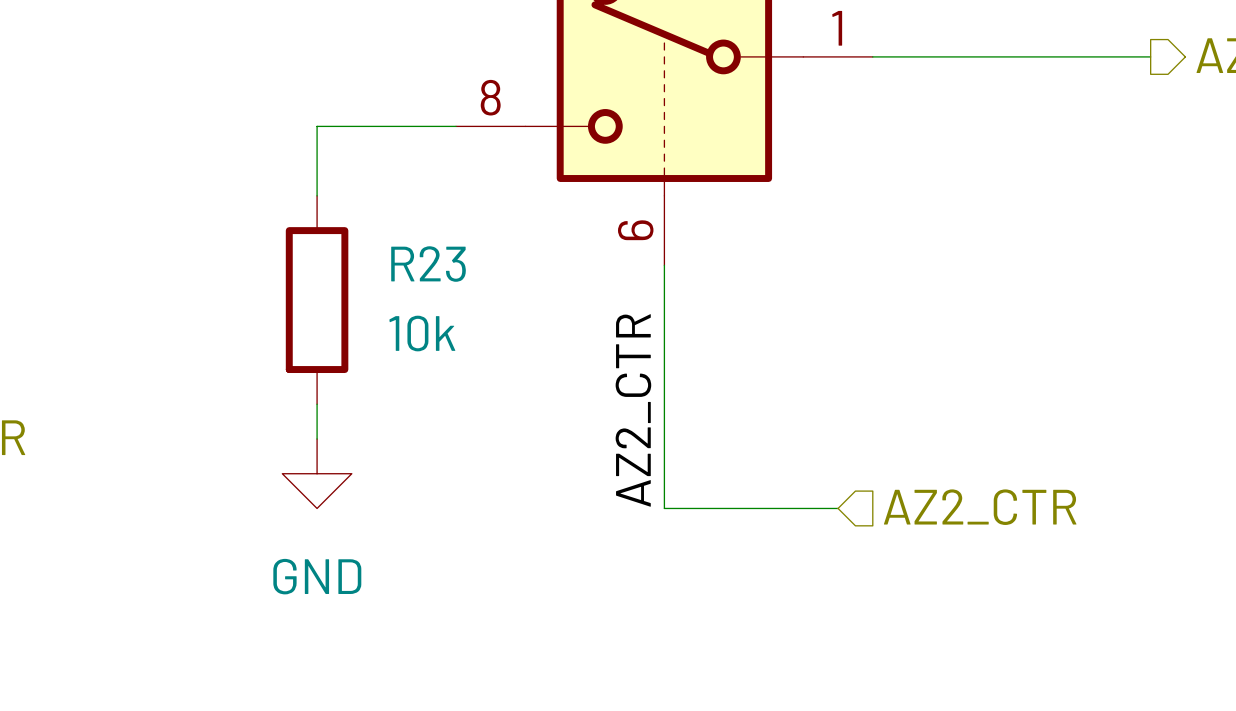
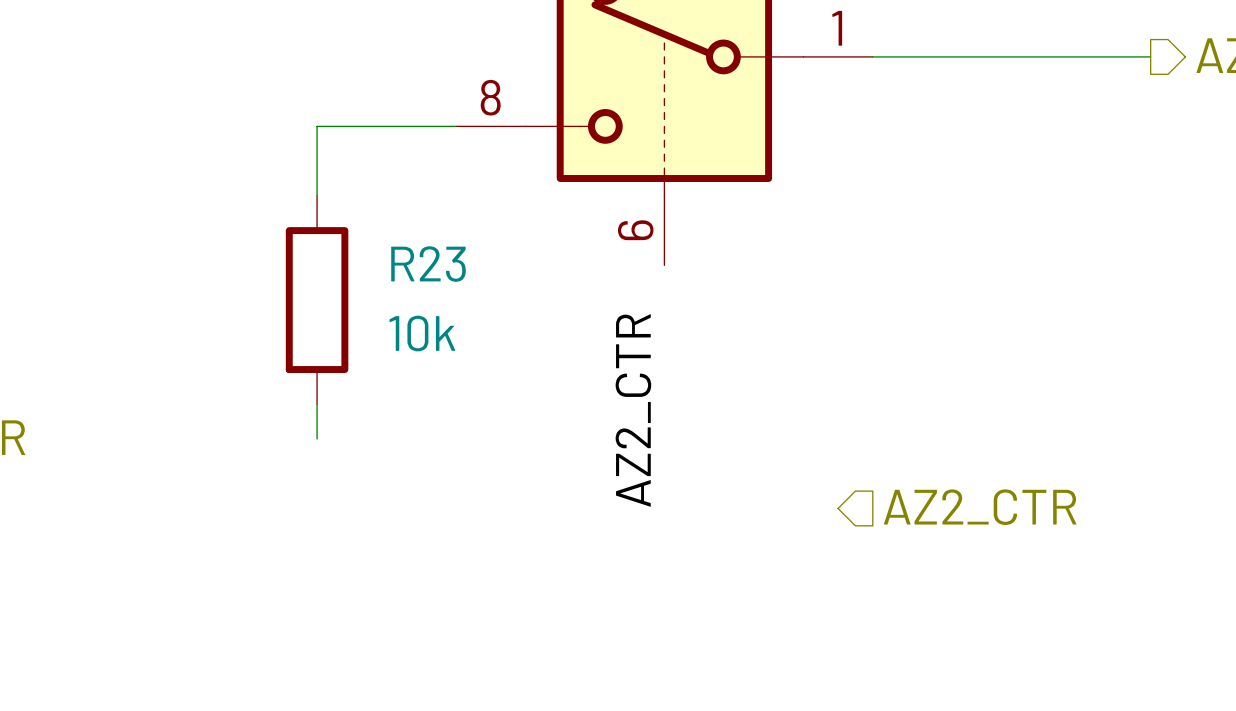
wire: (664, 265) (664, 508) (838, 508) -> none
power symbol: GND (317, 473) -> none

